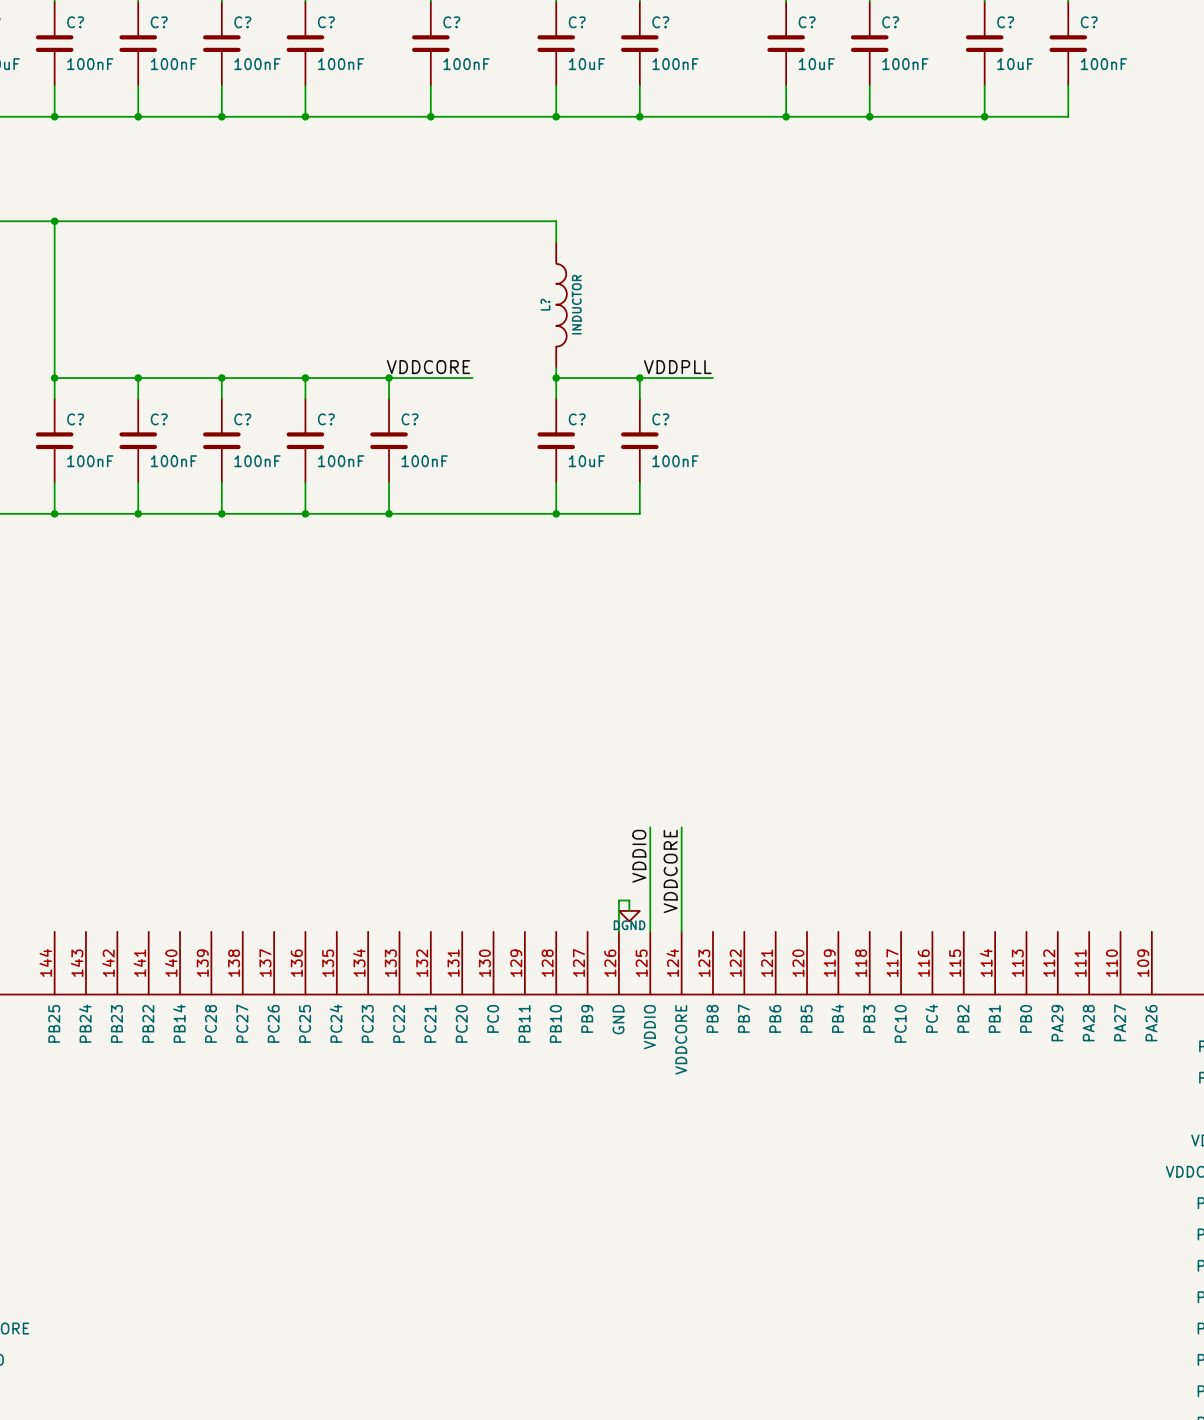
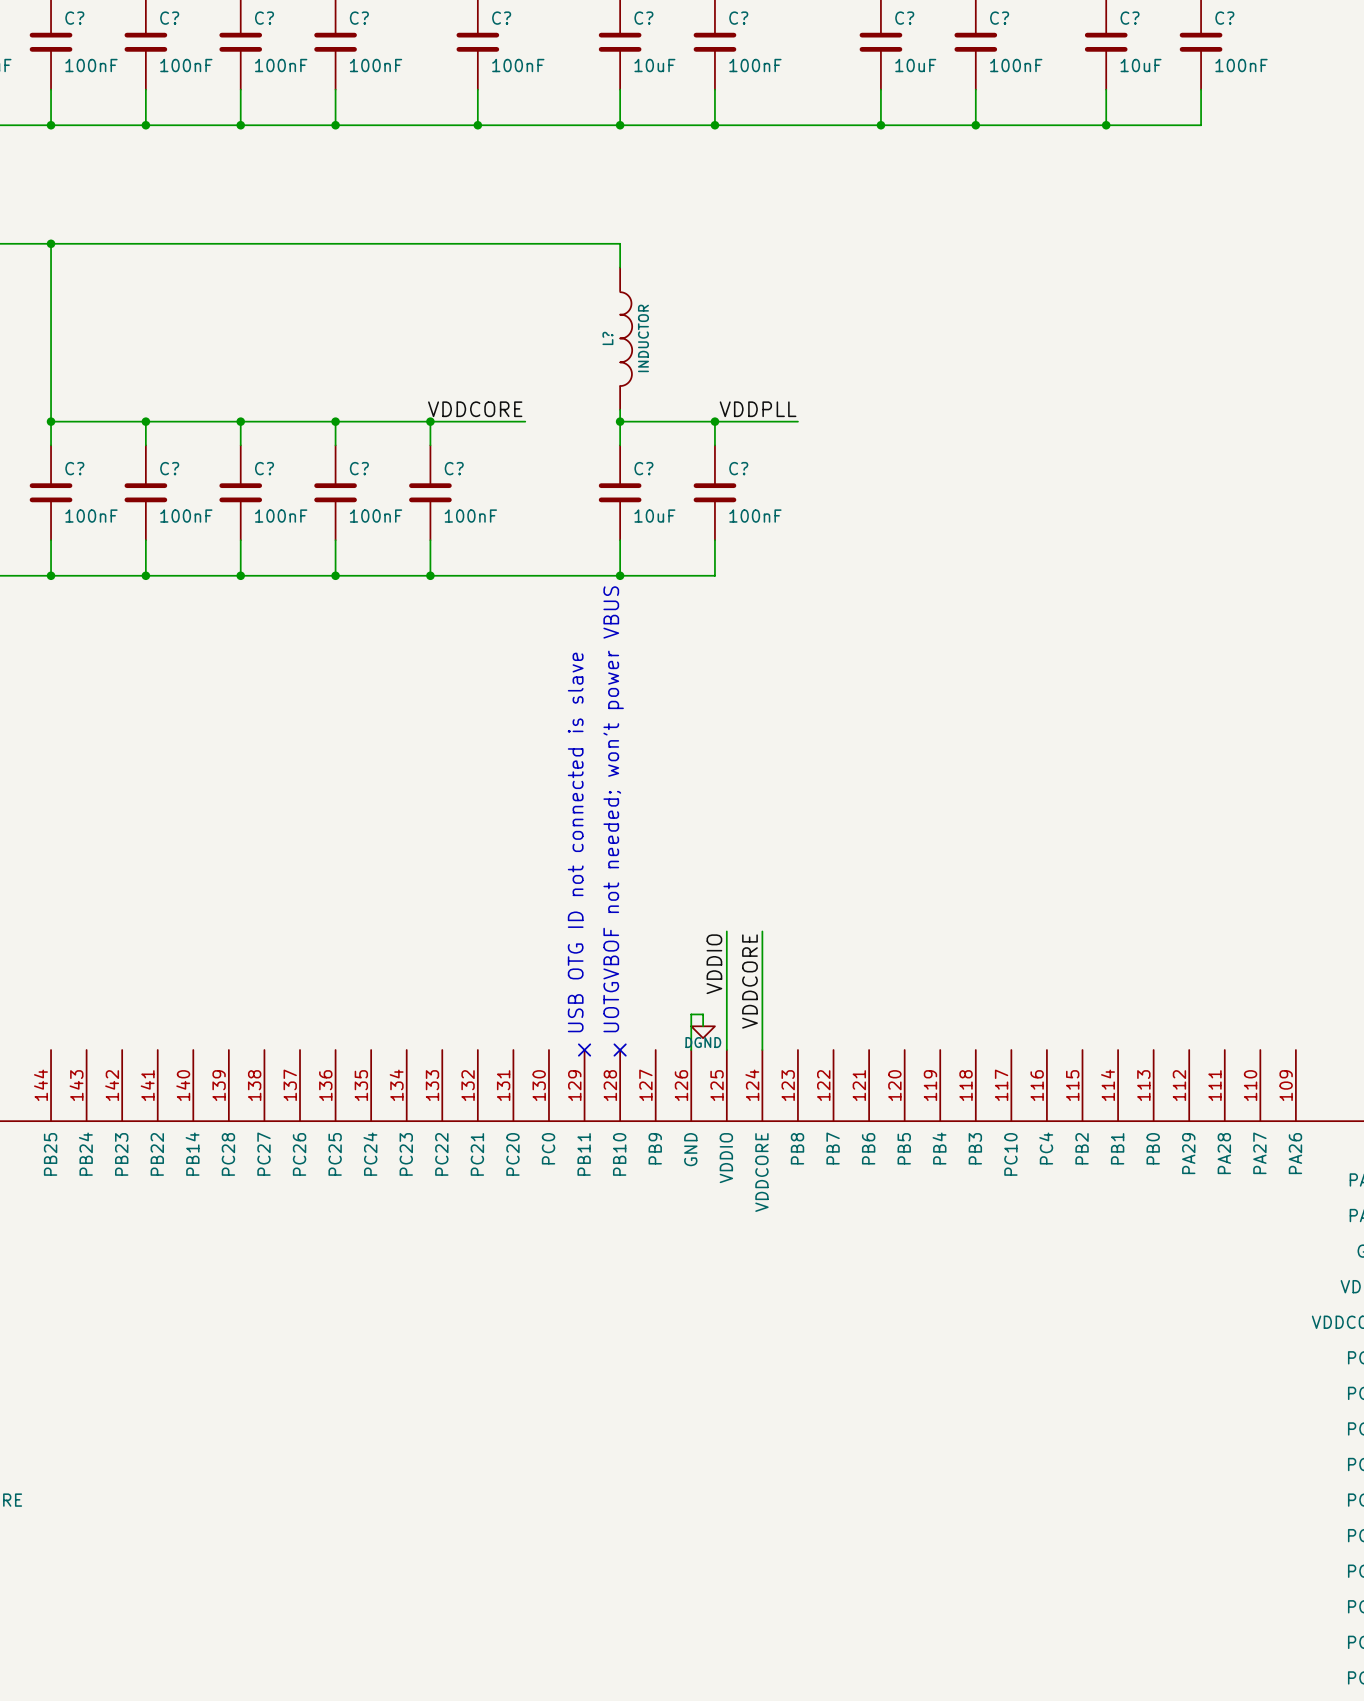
text: none -> UOTGVBOF not needed; won't power VBUS (613, 809)
text: none -> USB OTG ID not connected is slave (575, 842)
no-connect mark: none -> (584, 1050)
no-connect mark: none -> (620, 1050)

